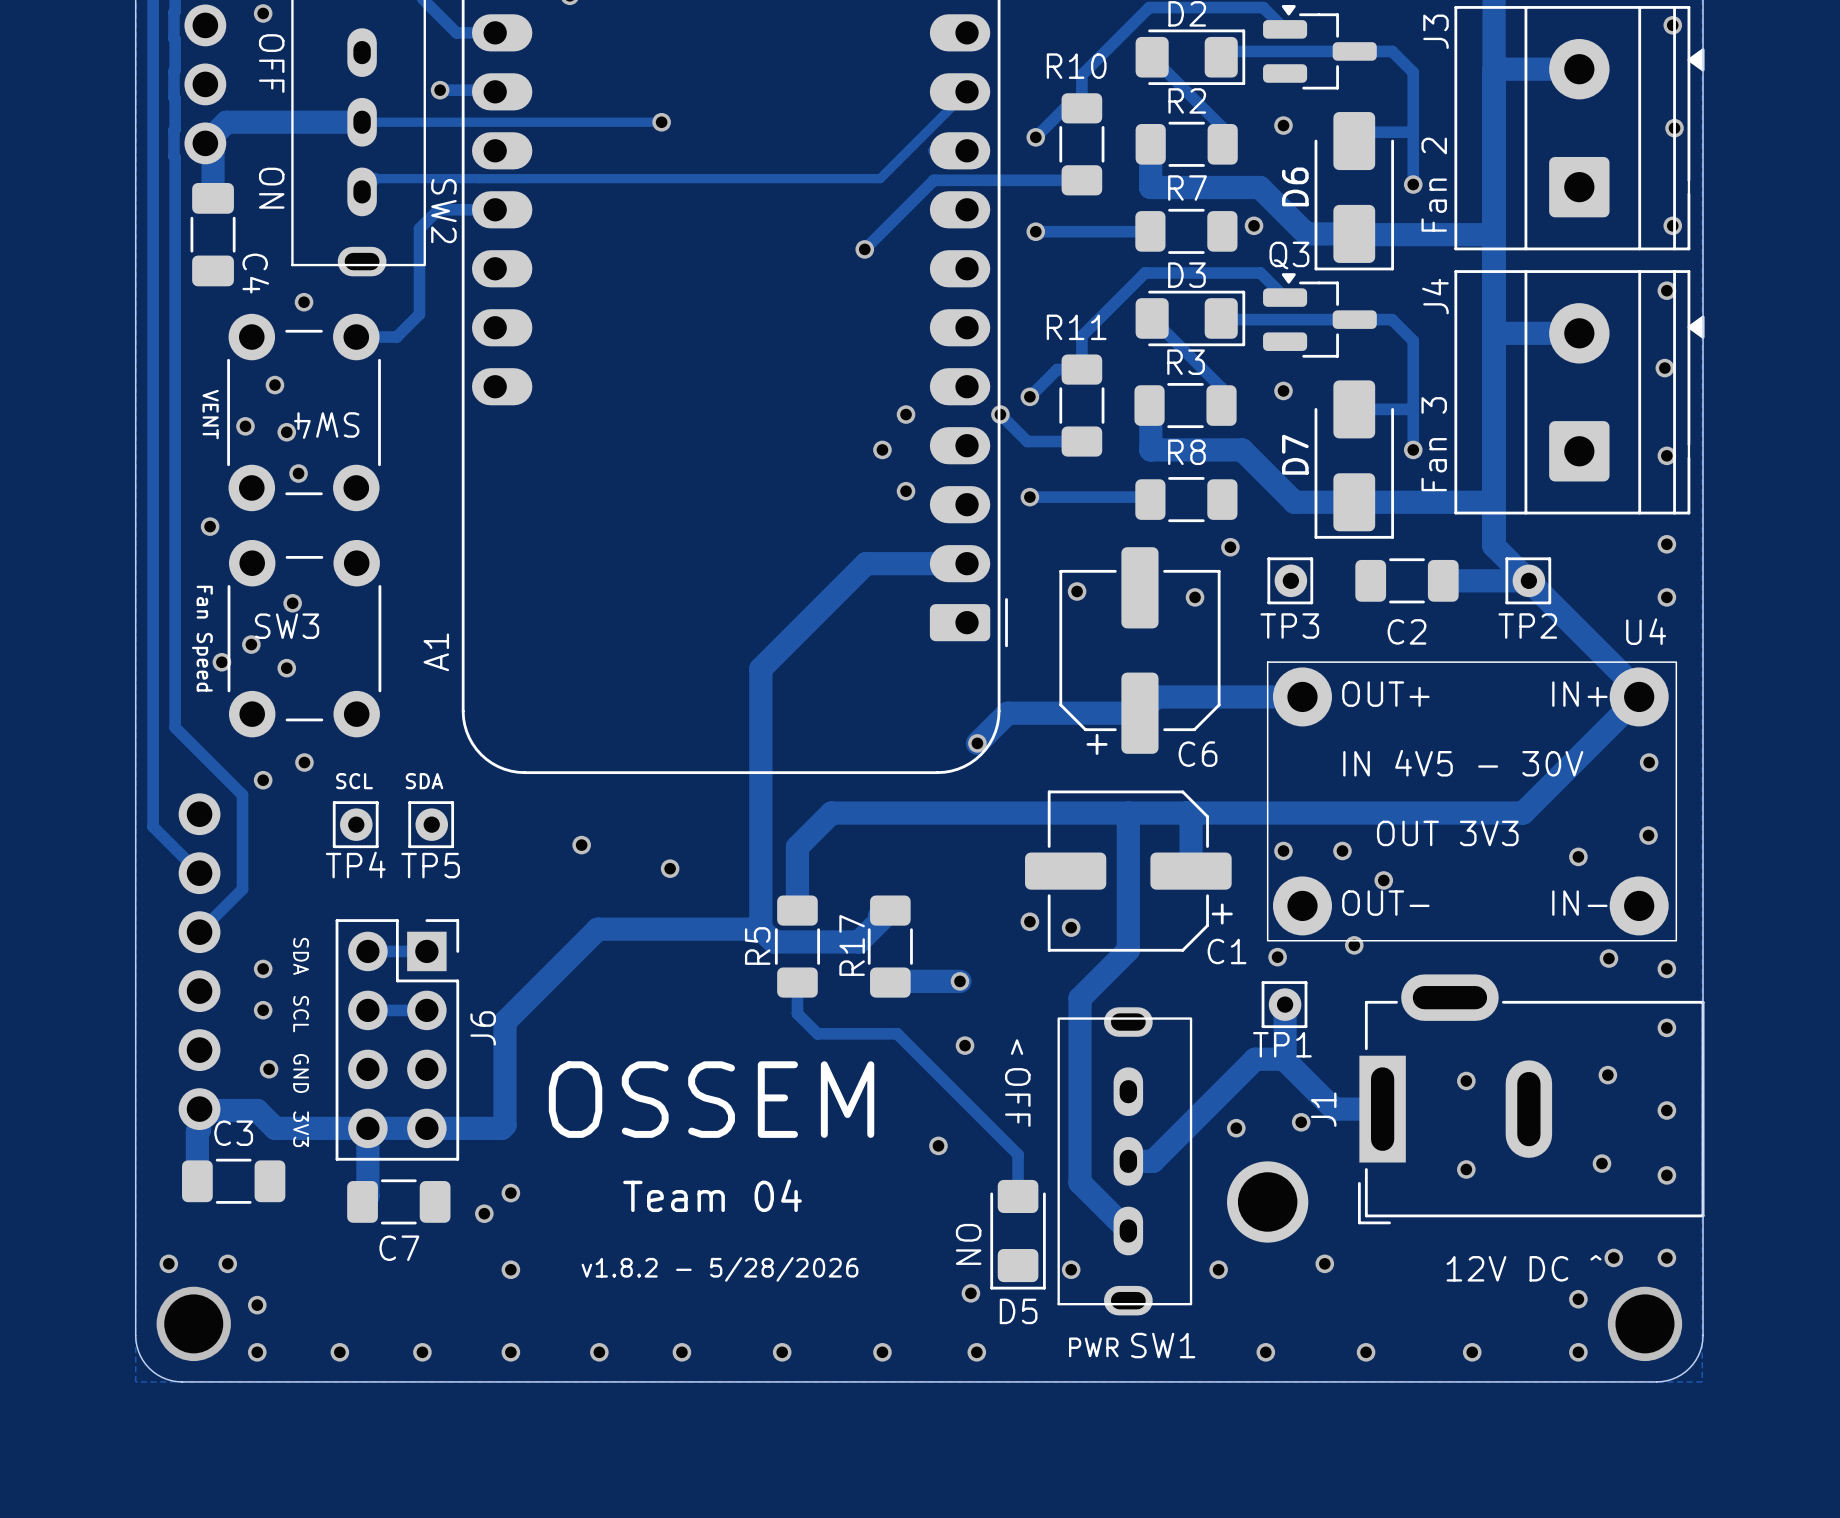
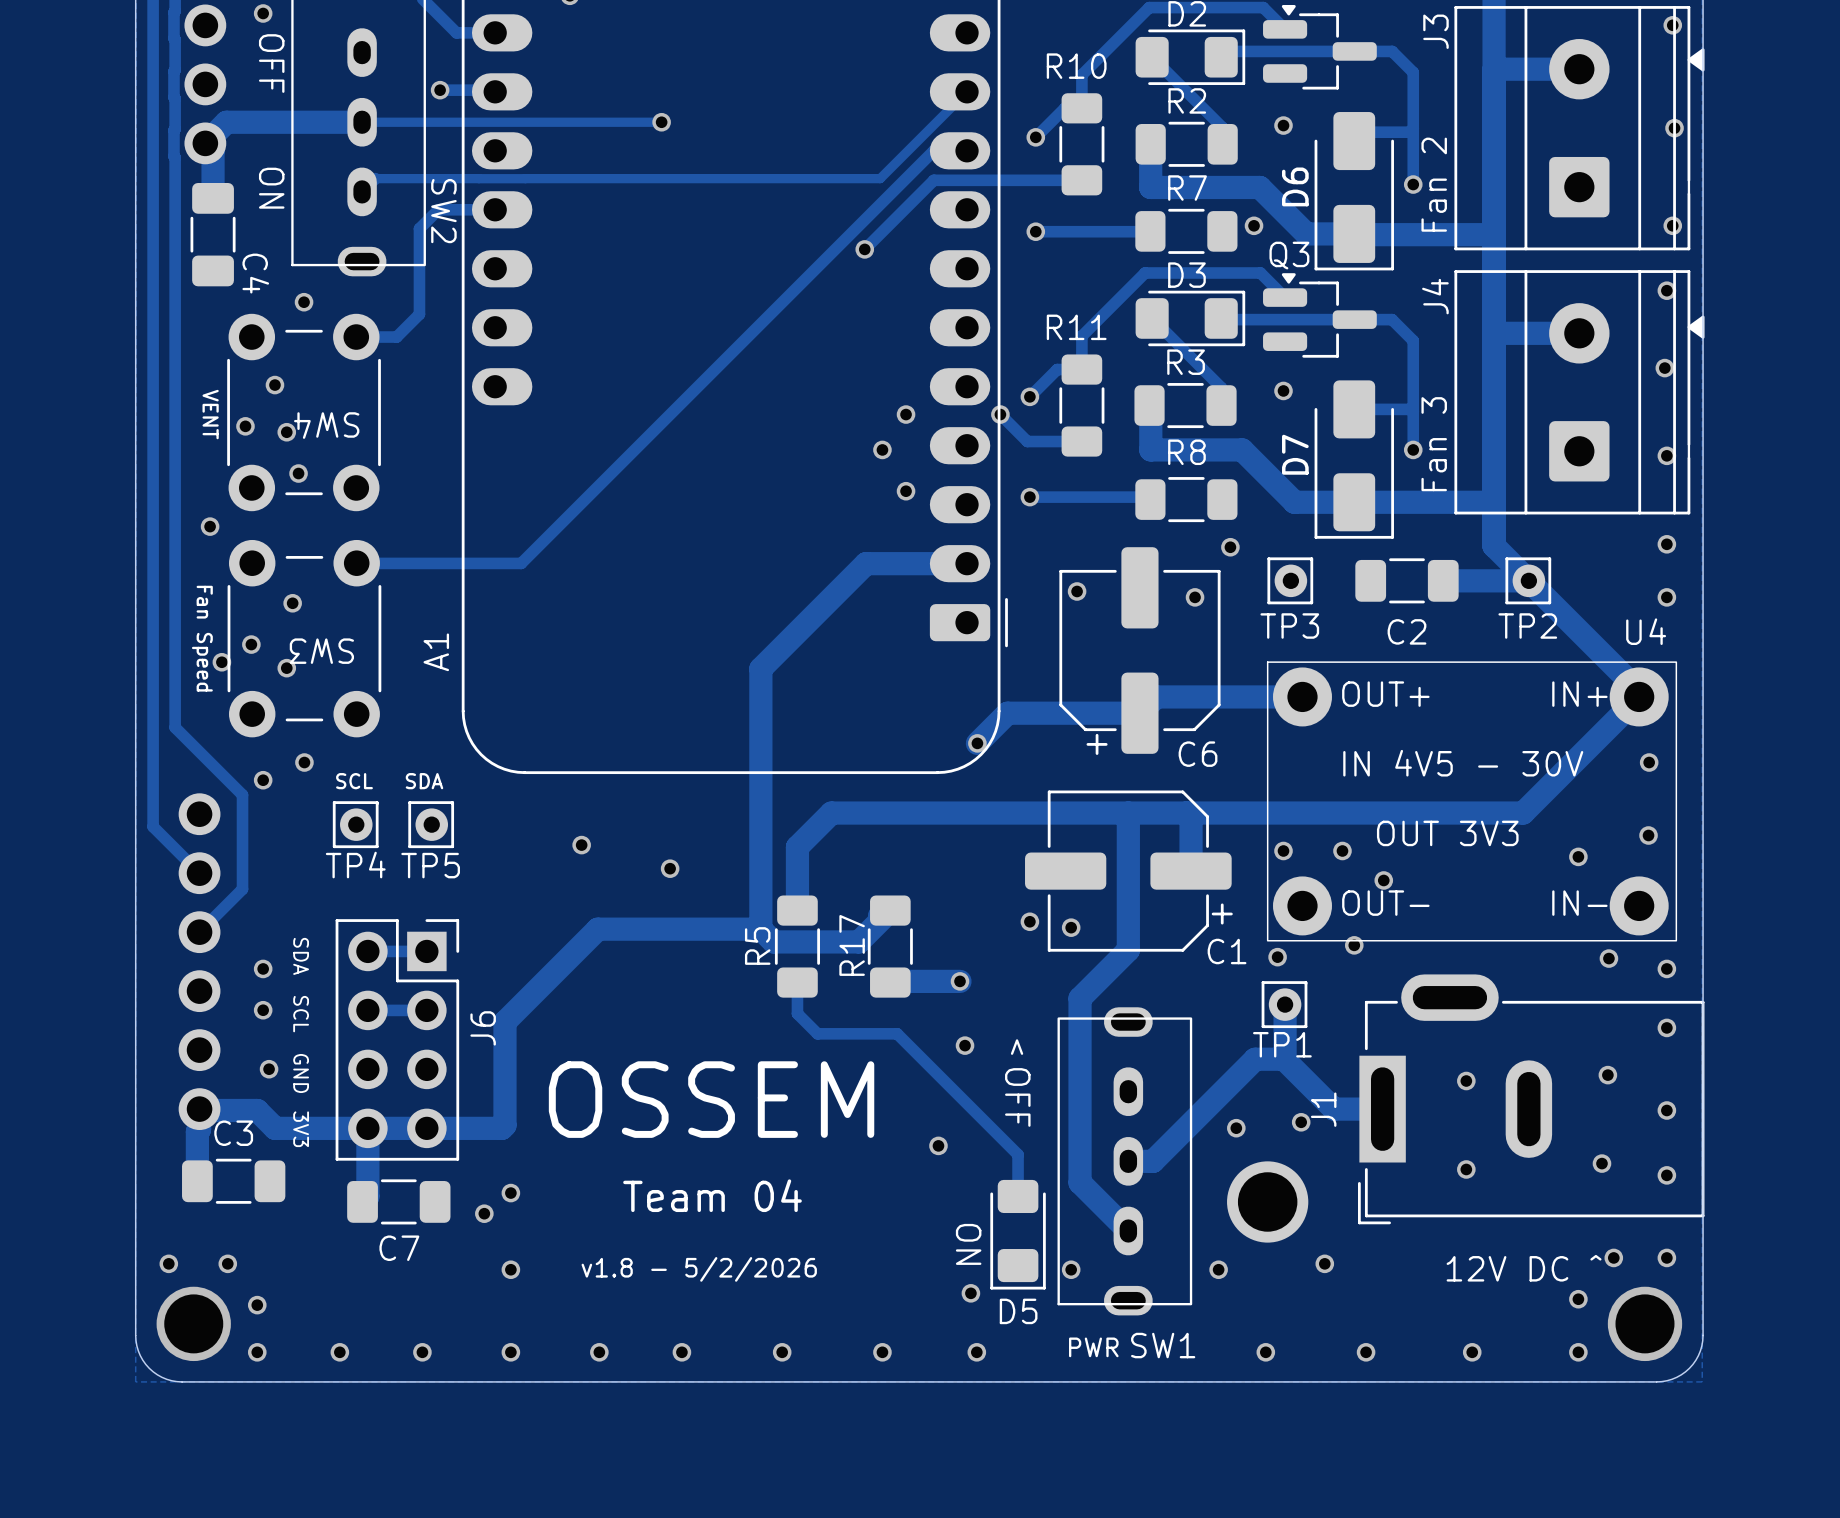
track: none -> (933, 150) (521, 563) (356, 563)
SW3 name rotation: 0° (287, 626) -> 180° (321, 651)
text: v1.8.2 - 5/28/2026 (719, 1269) -> v1.8 - 5/2/2026 (699, 1269)

